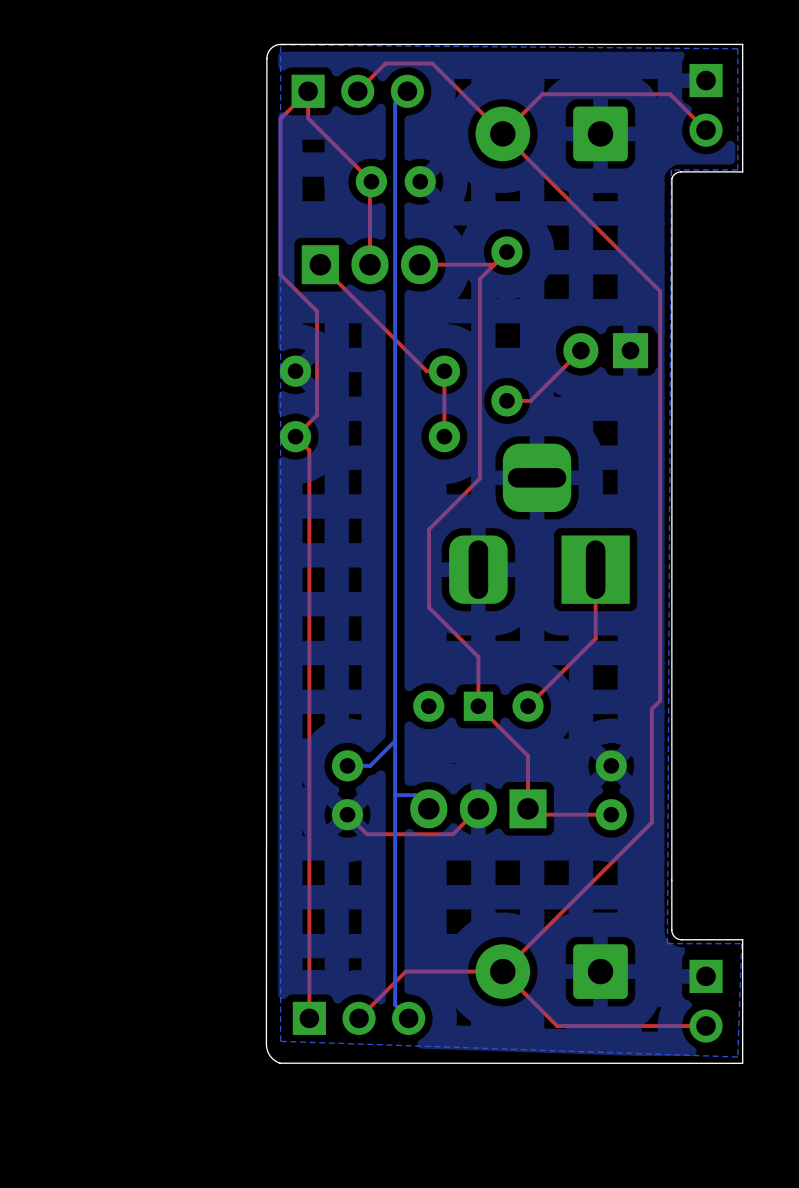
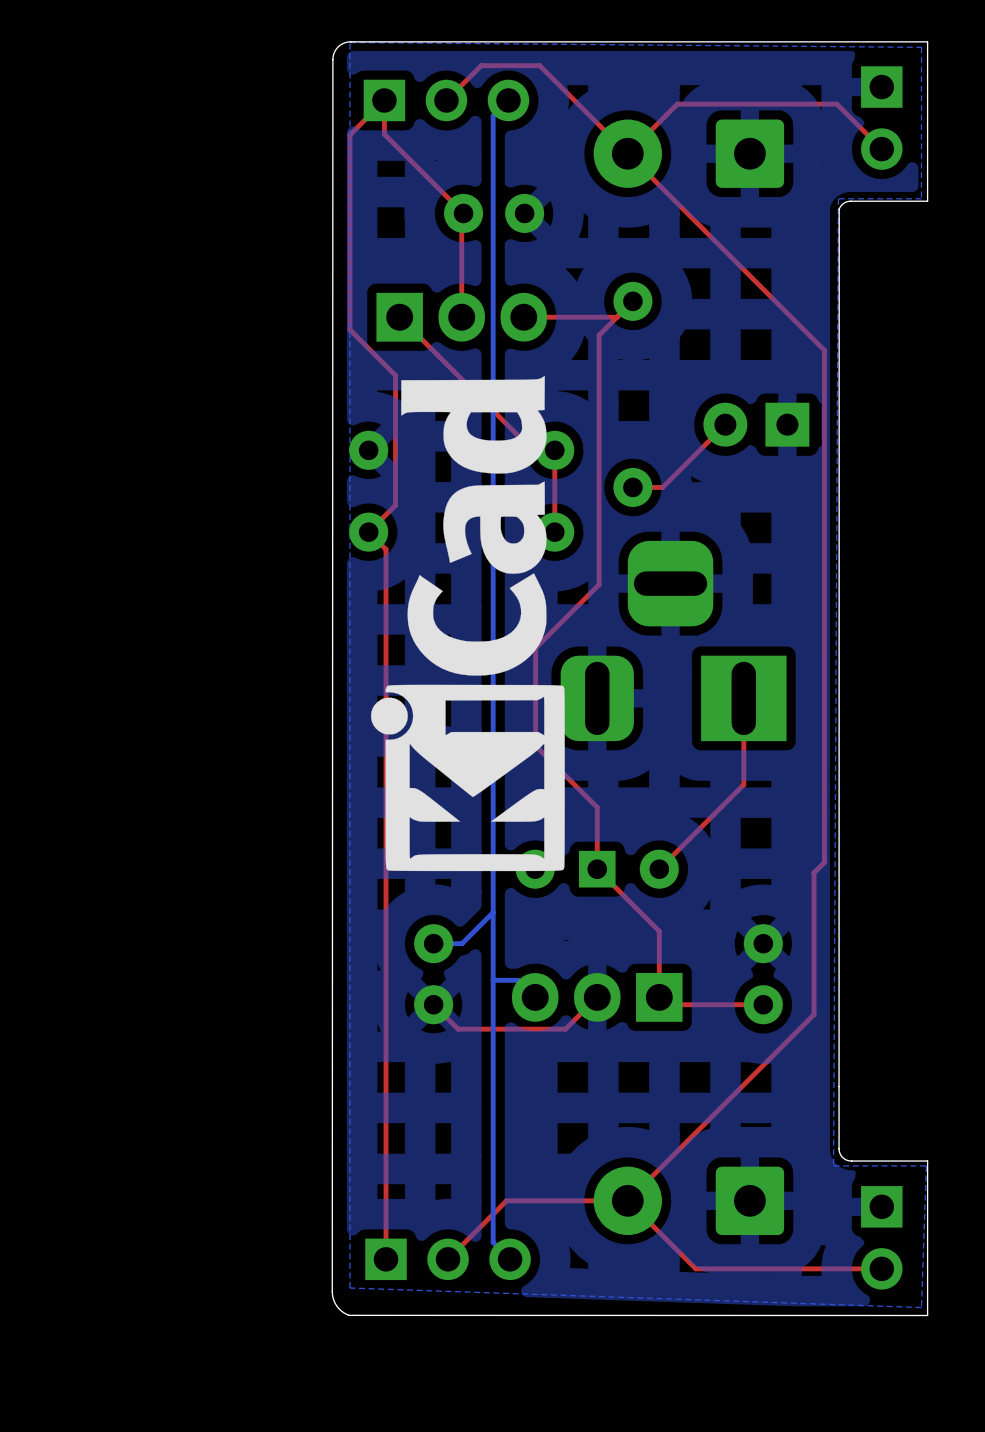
drawing: none -> [370, 375, 565, 872]

